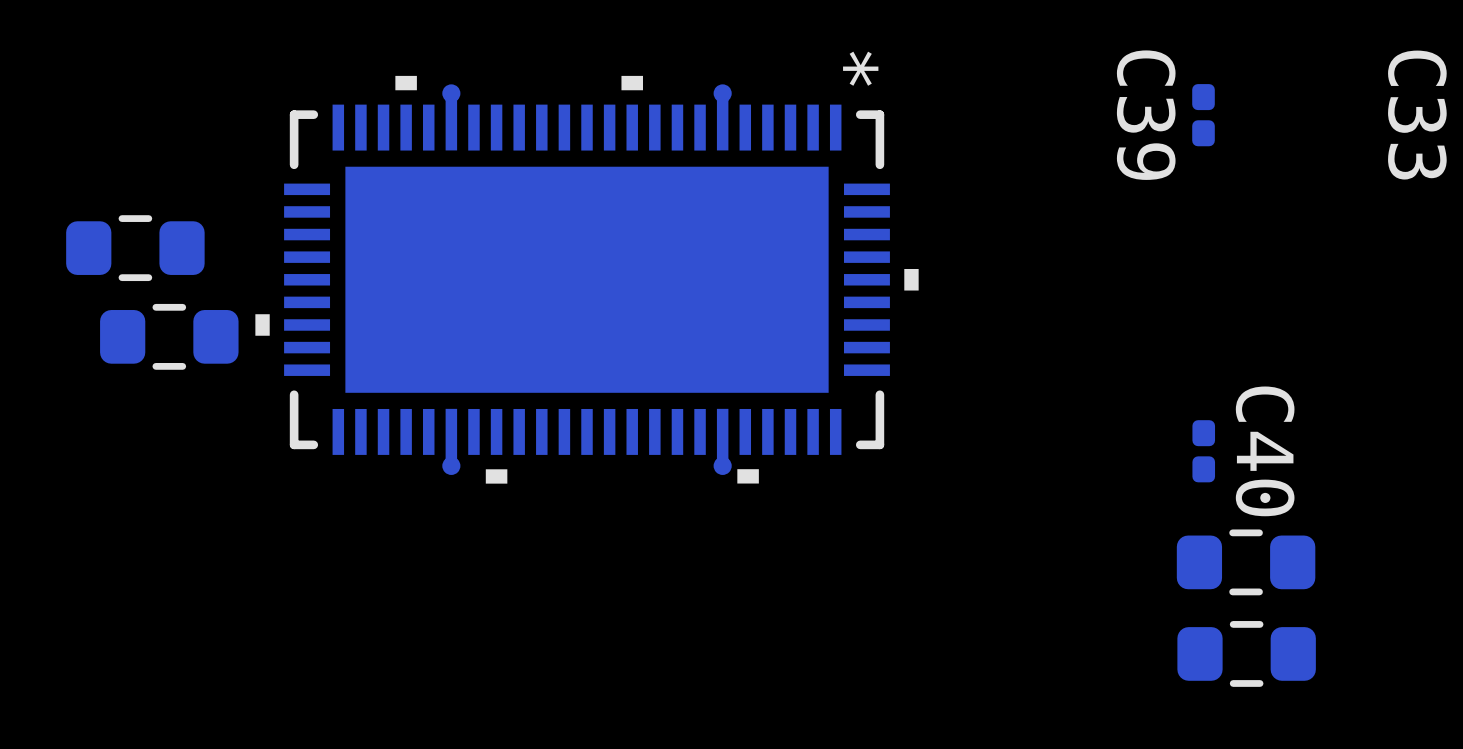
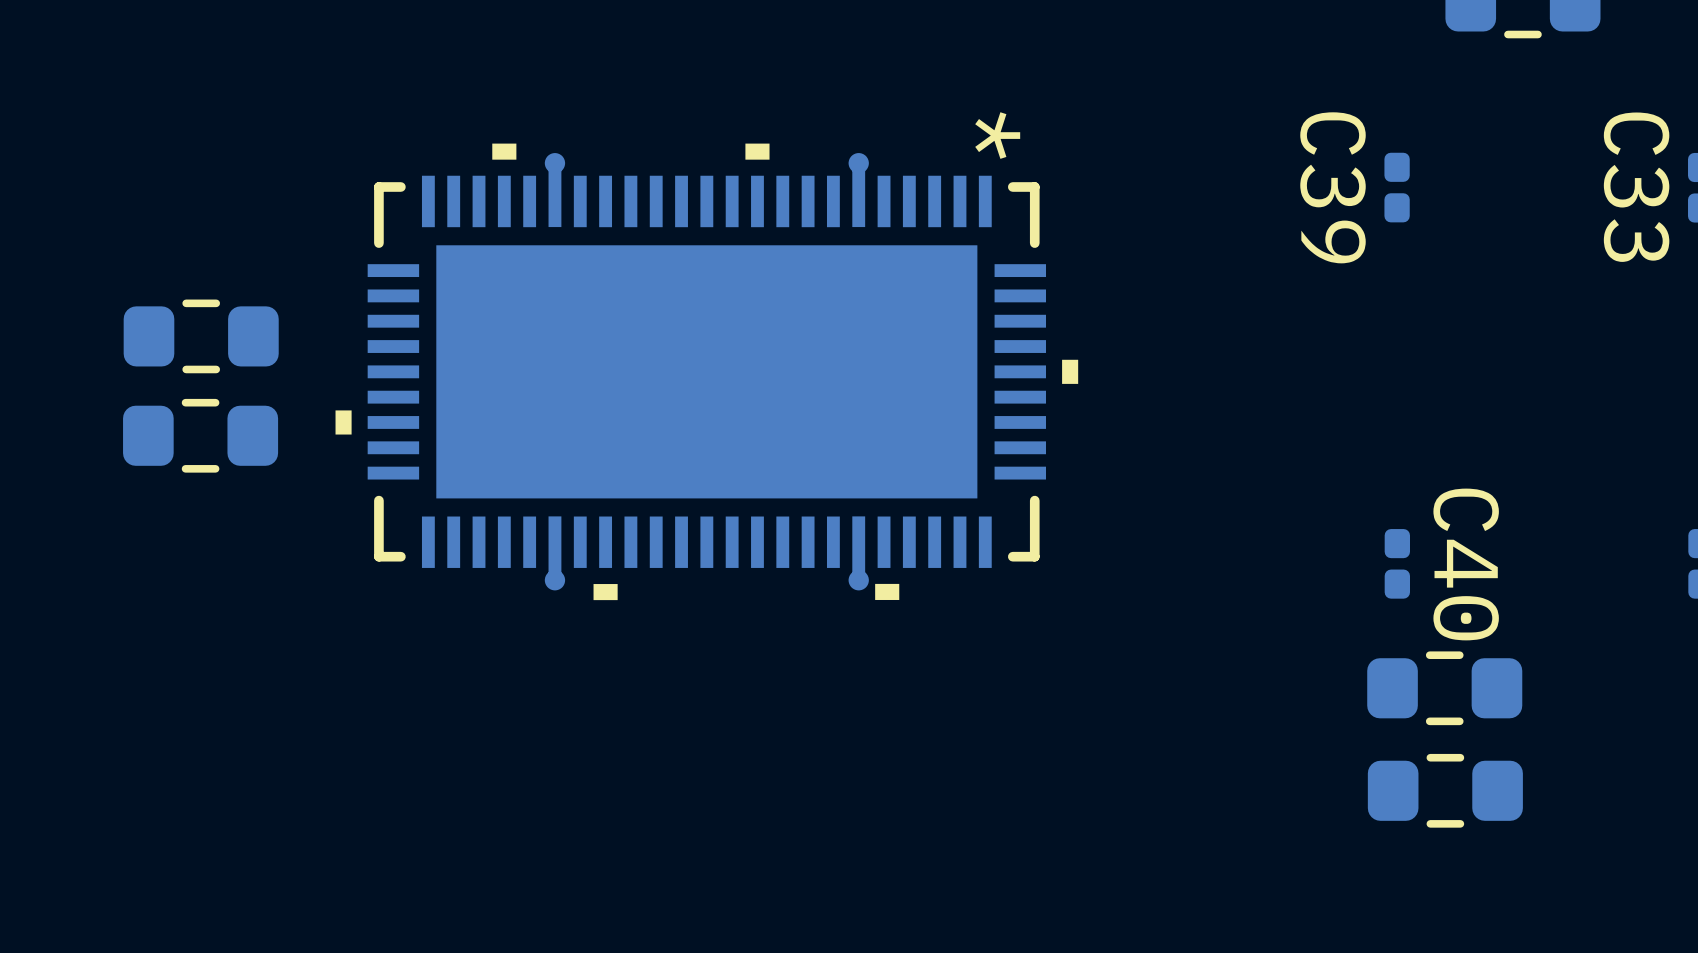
part position: (169, 336) -> (200, 435)

